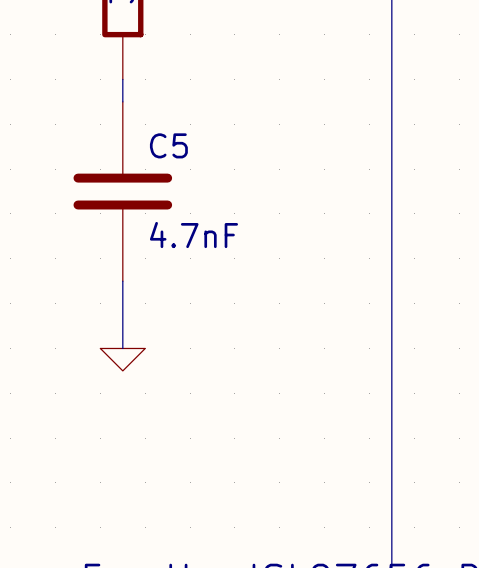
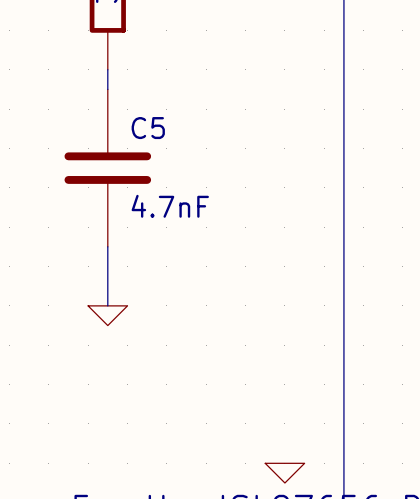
power symbol: none -> (284, 473)

